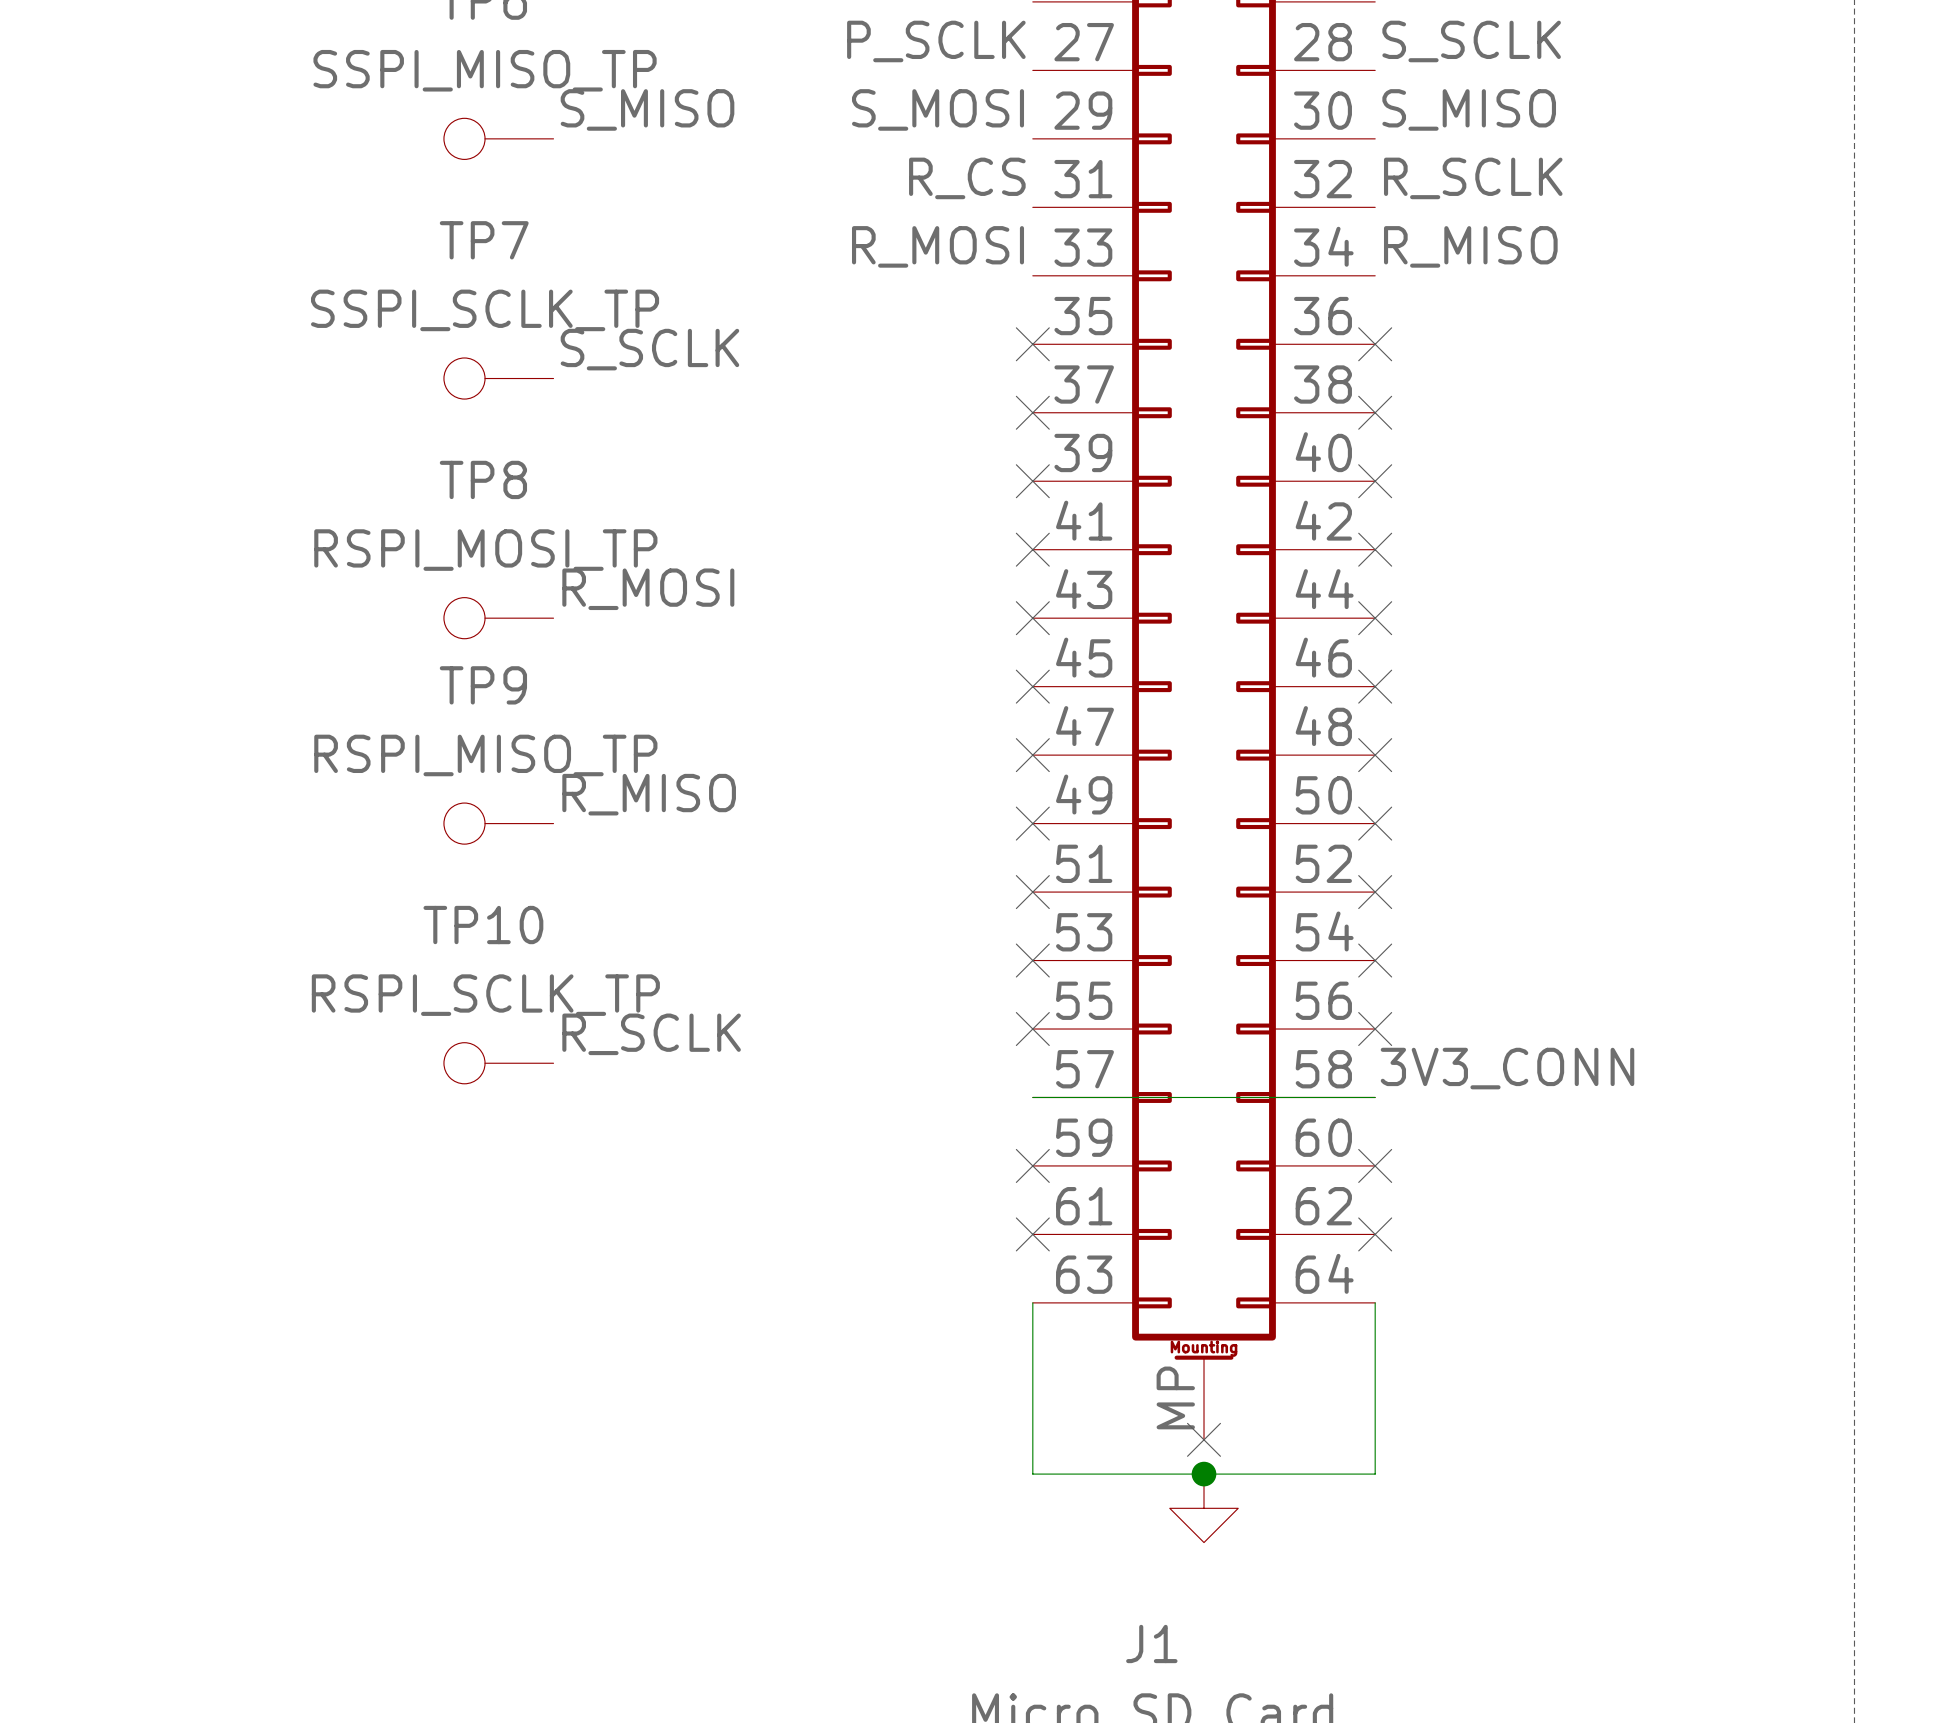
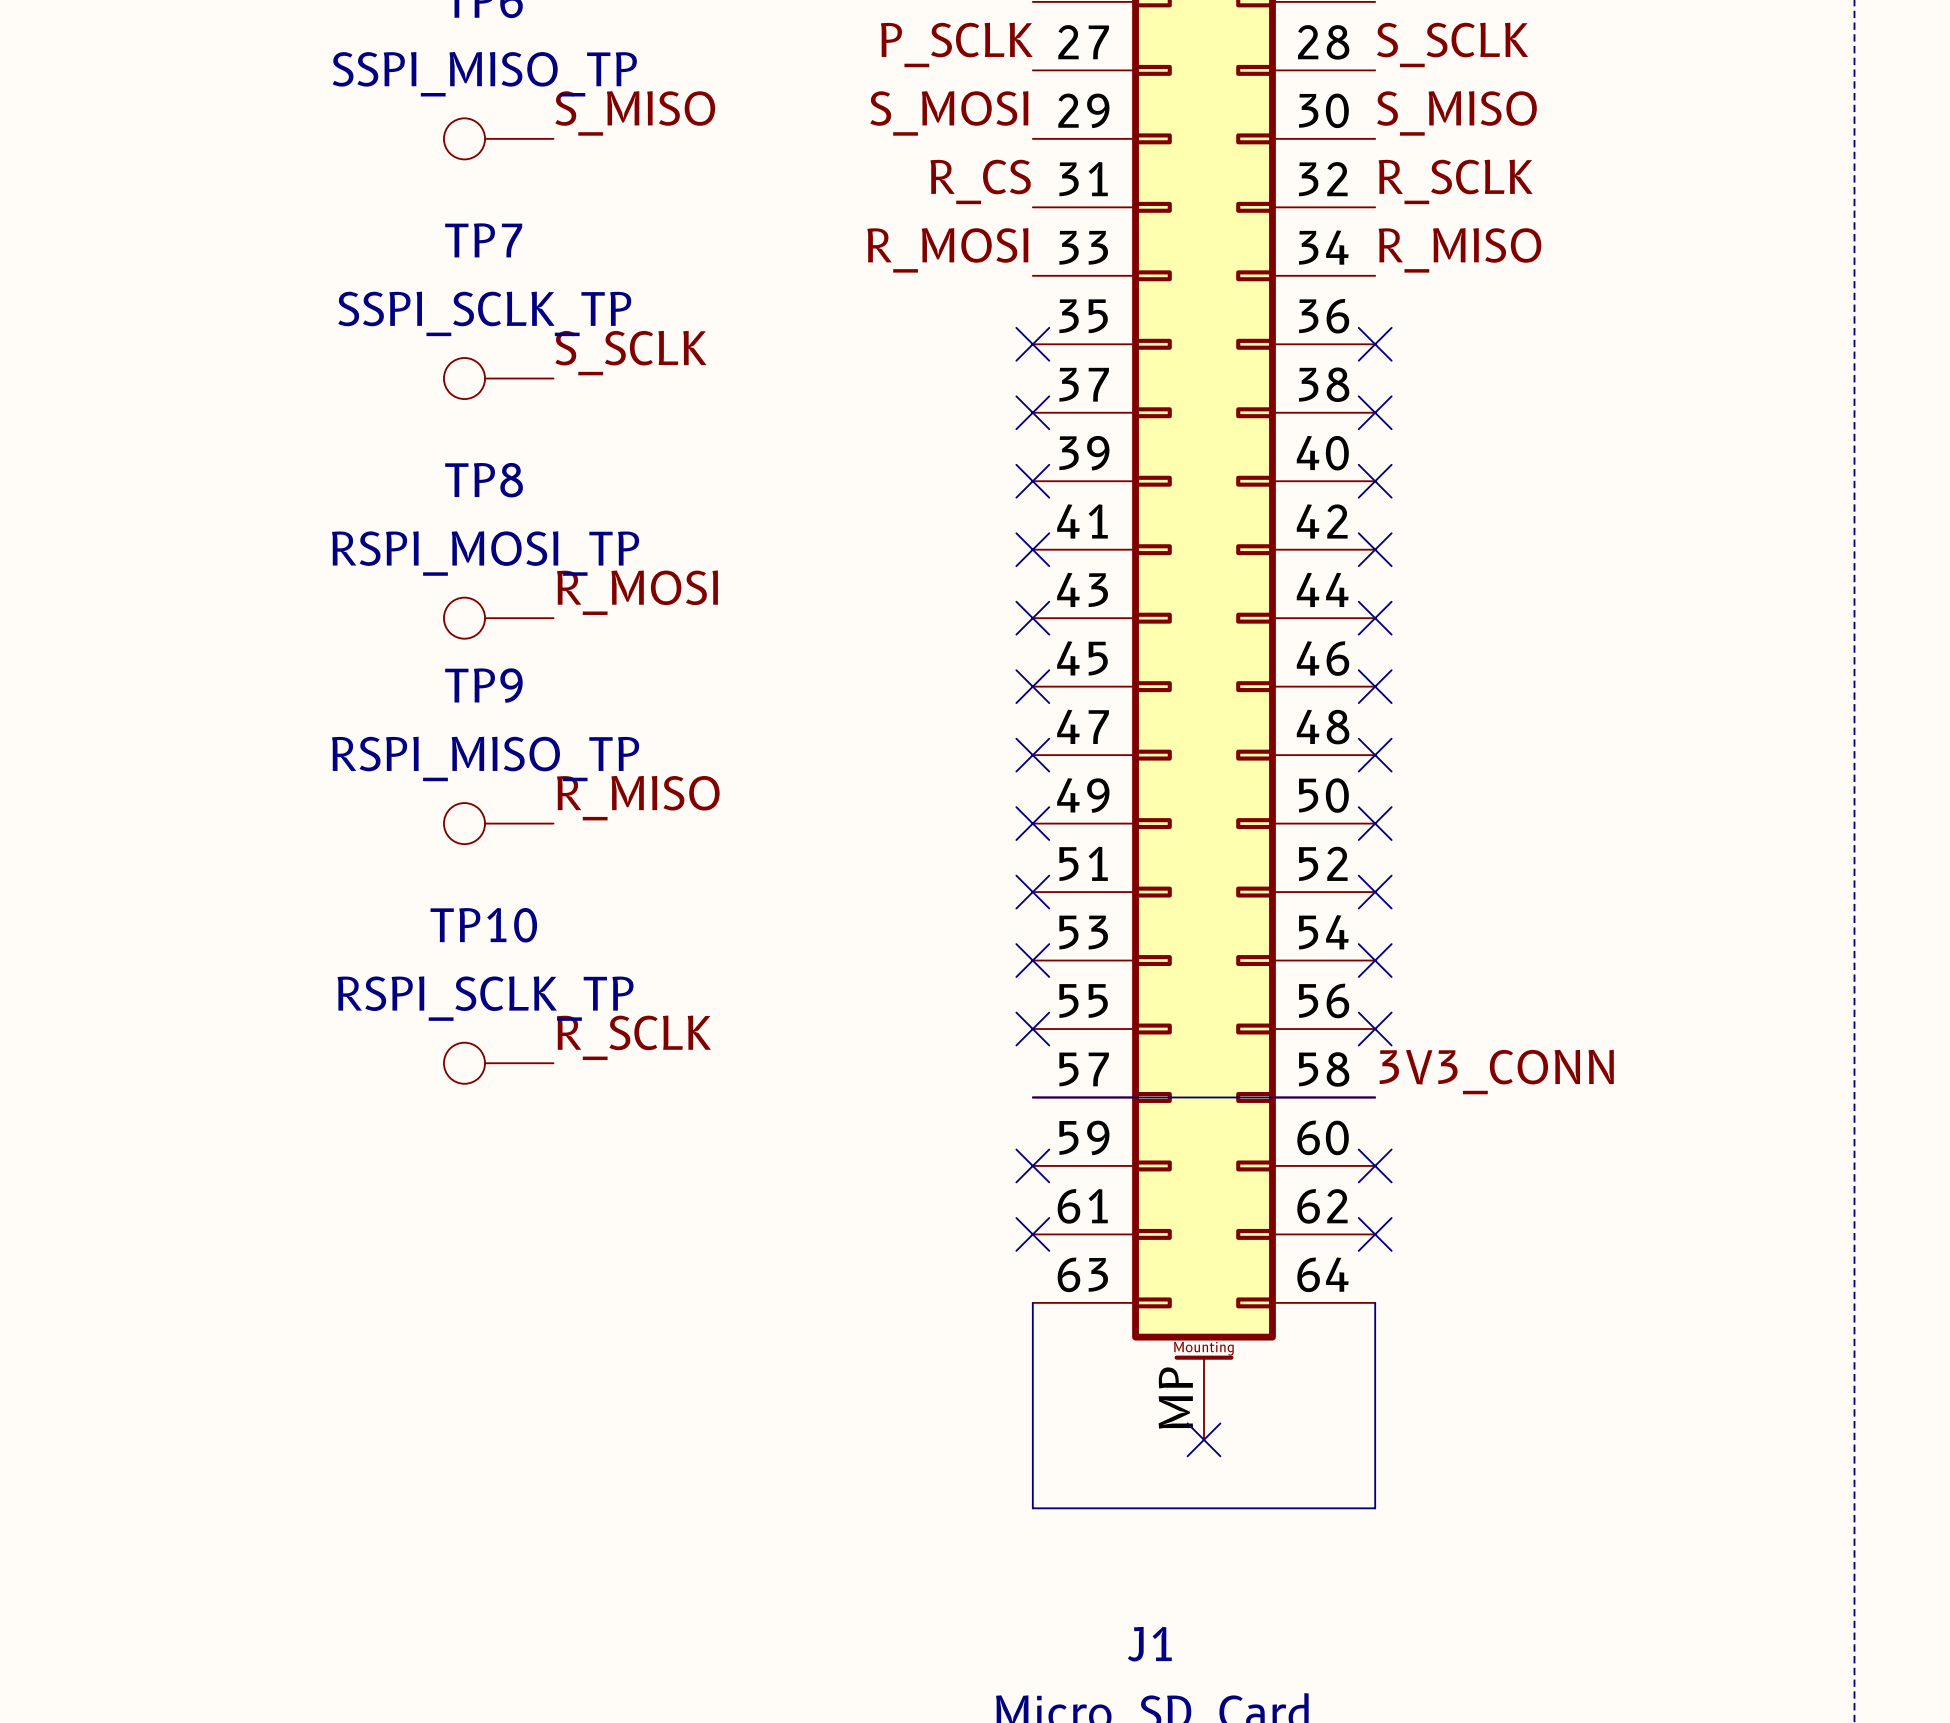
wire: (1032, 1474) (1375, 1474) -> (1032, 1474) (1032, 1508) (1375, 1508) (1375, 1474)
junction: (1204, 1474) -> none
power symbol: (1204, 1508) -> none

